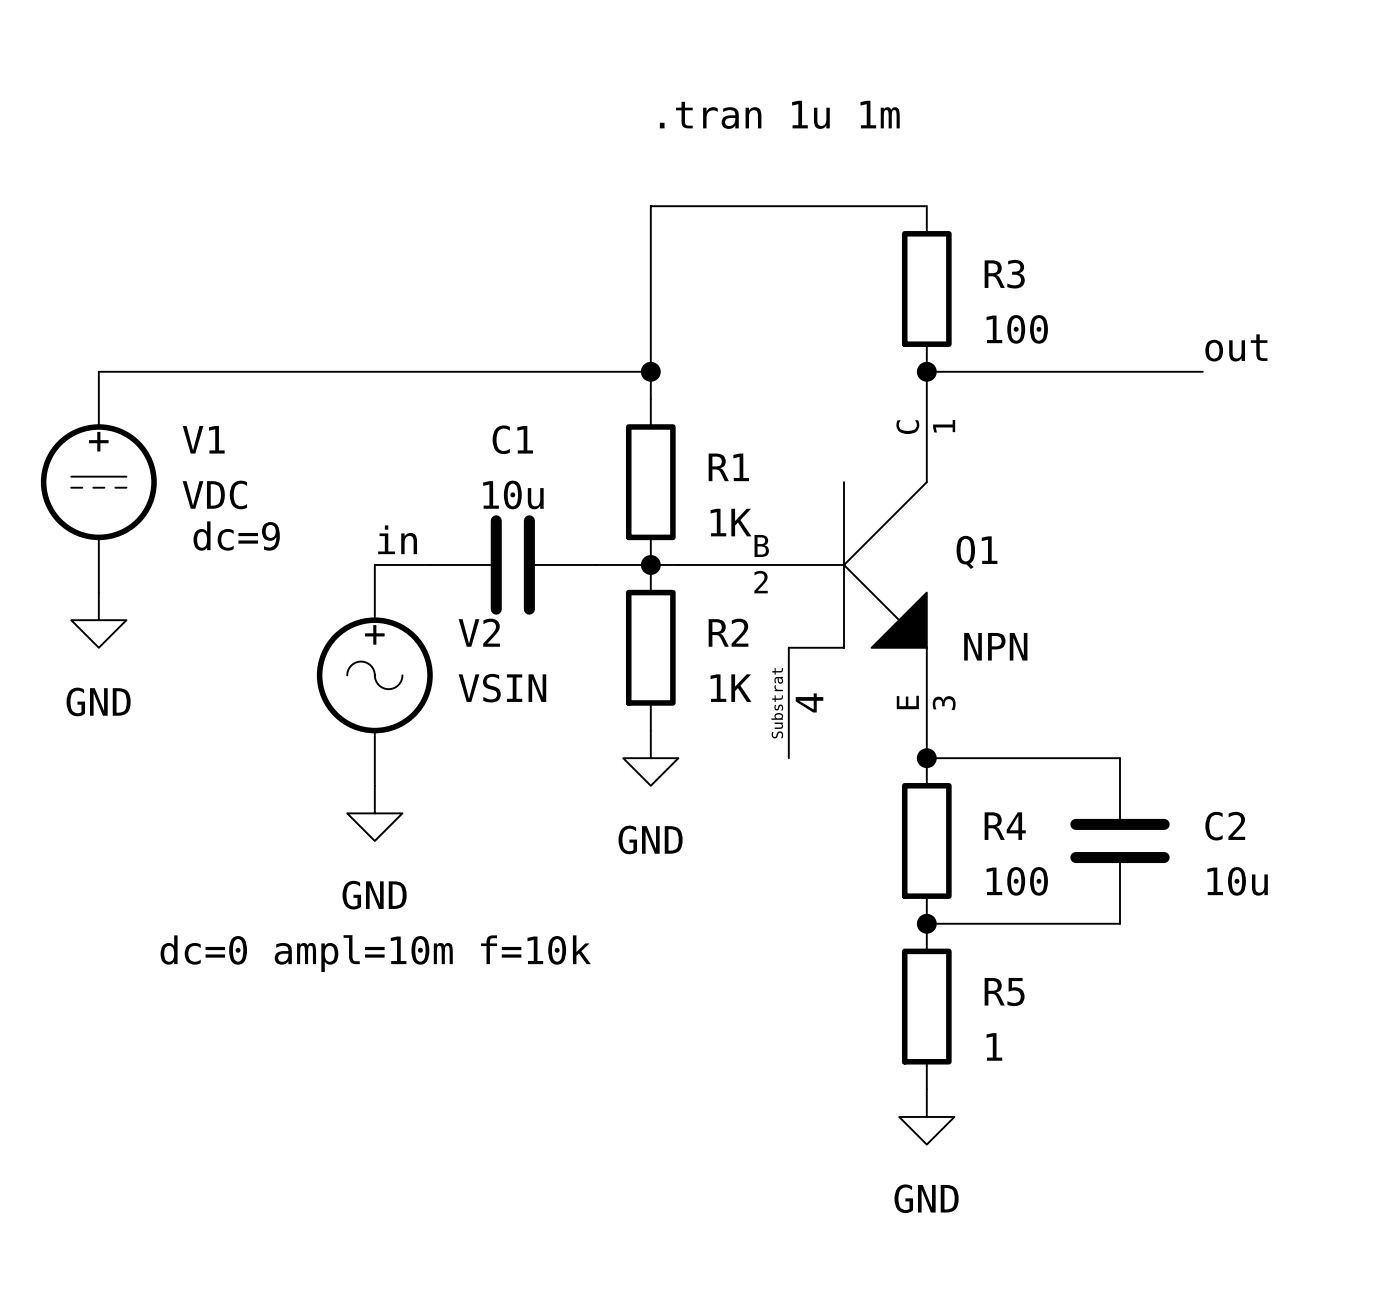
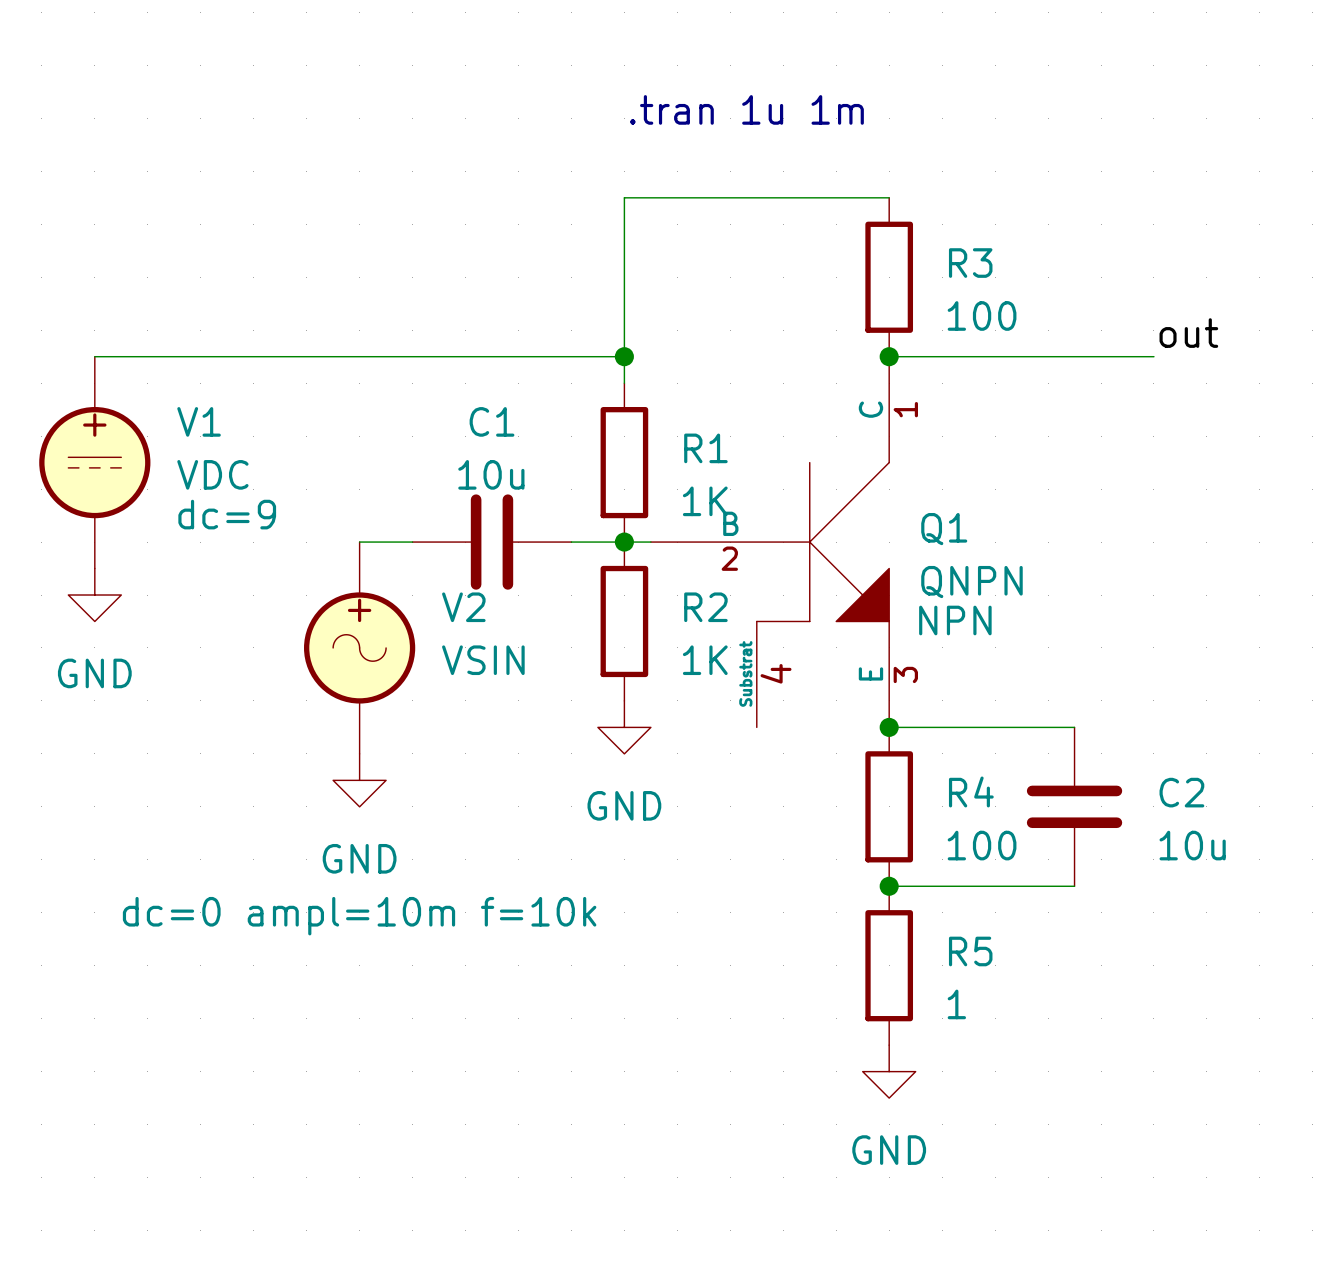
label: in (397, 539) -> none
Q1 value: none -> QNPN (971, 582)

